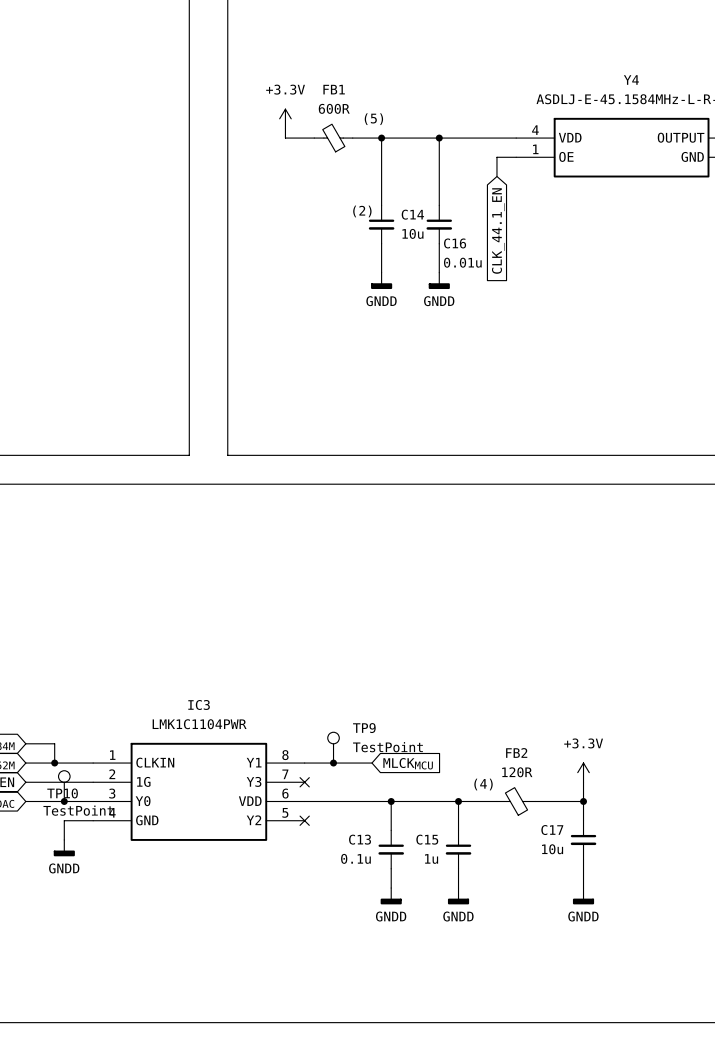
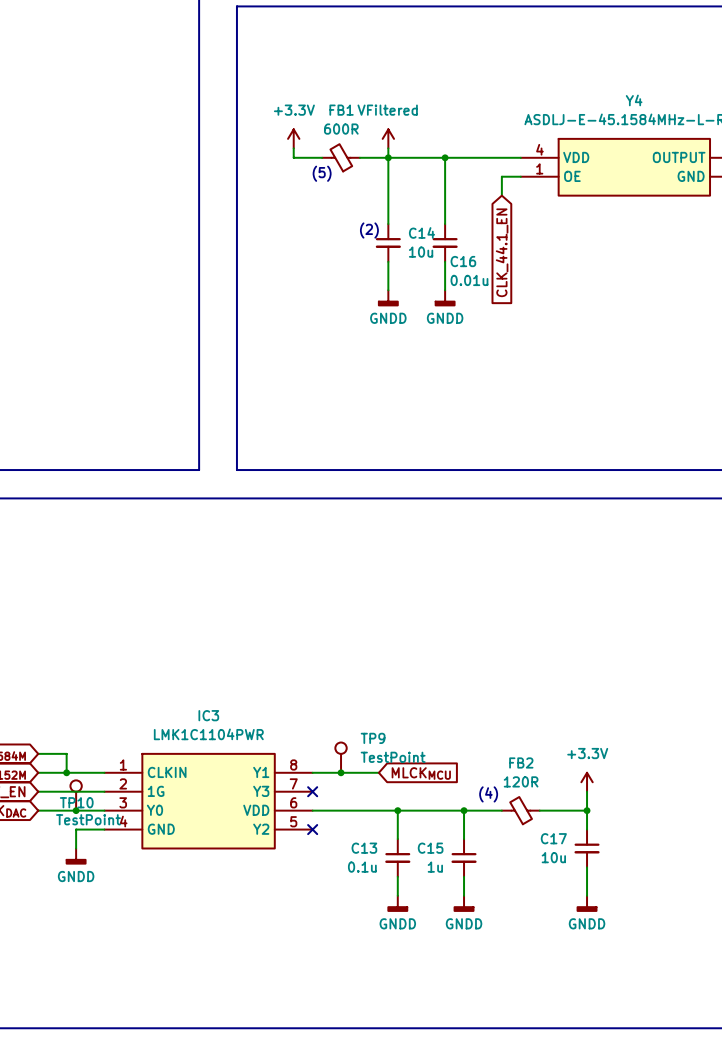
power symbol: none -> VFiltered (388, 138)
text position: (5) (373, 119) -> (5) (322, 173)
wire: none -> (388, 148) (388, 157)

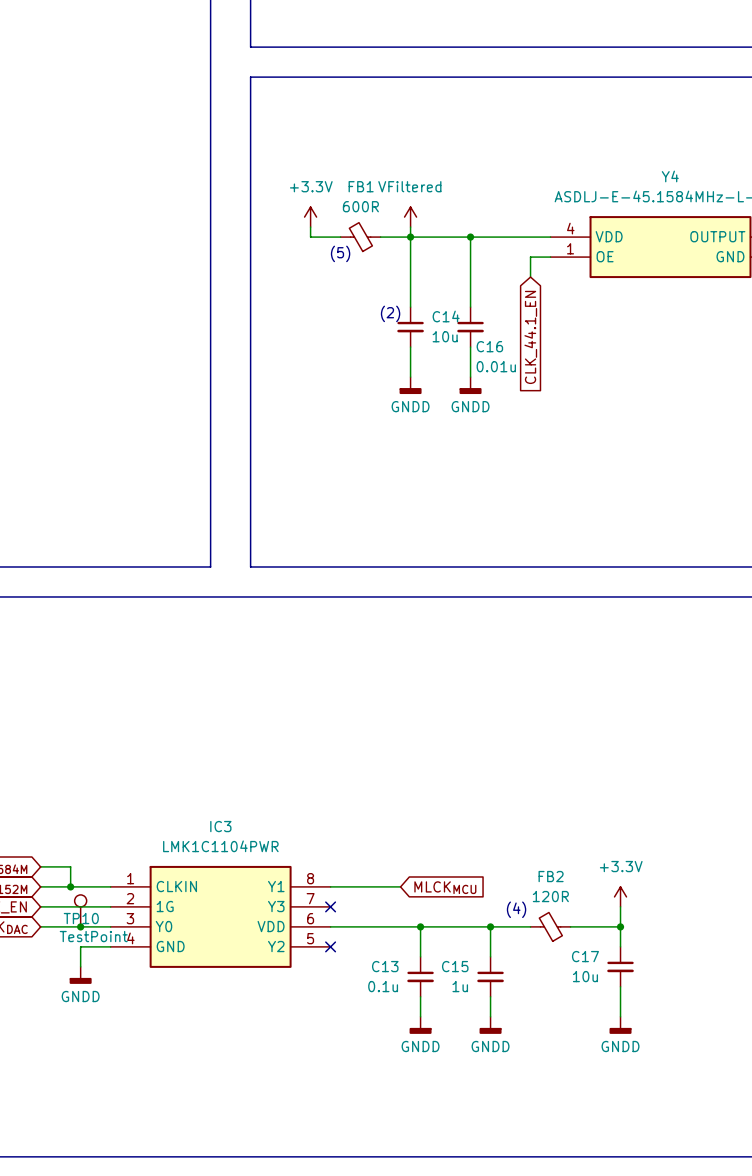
TP9: TestPoint (341, 757) -> none
junction: (341, 772) -> none

